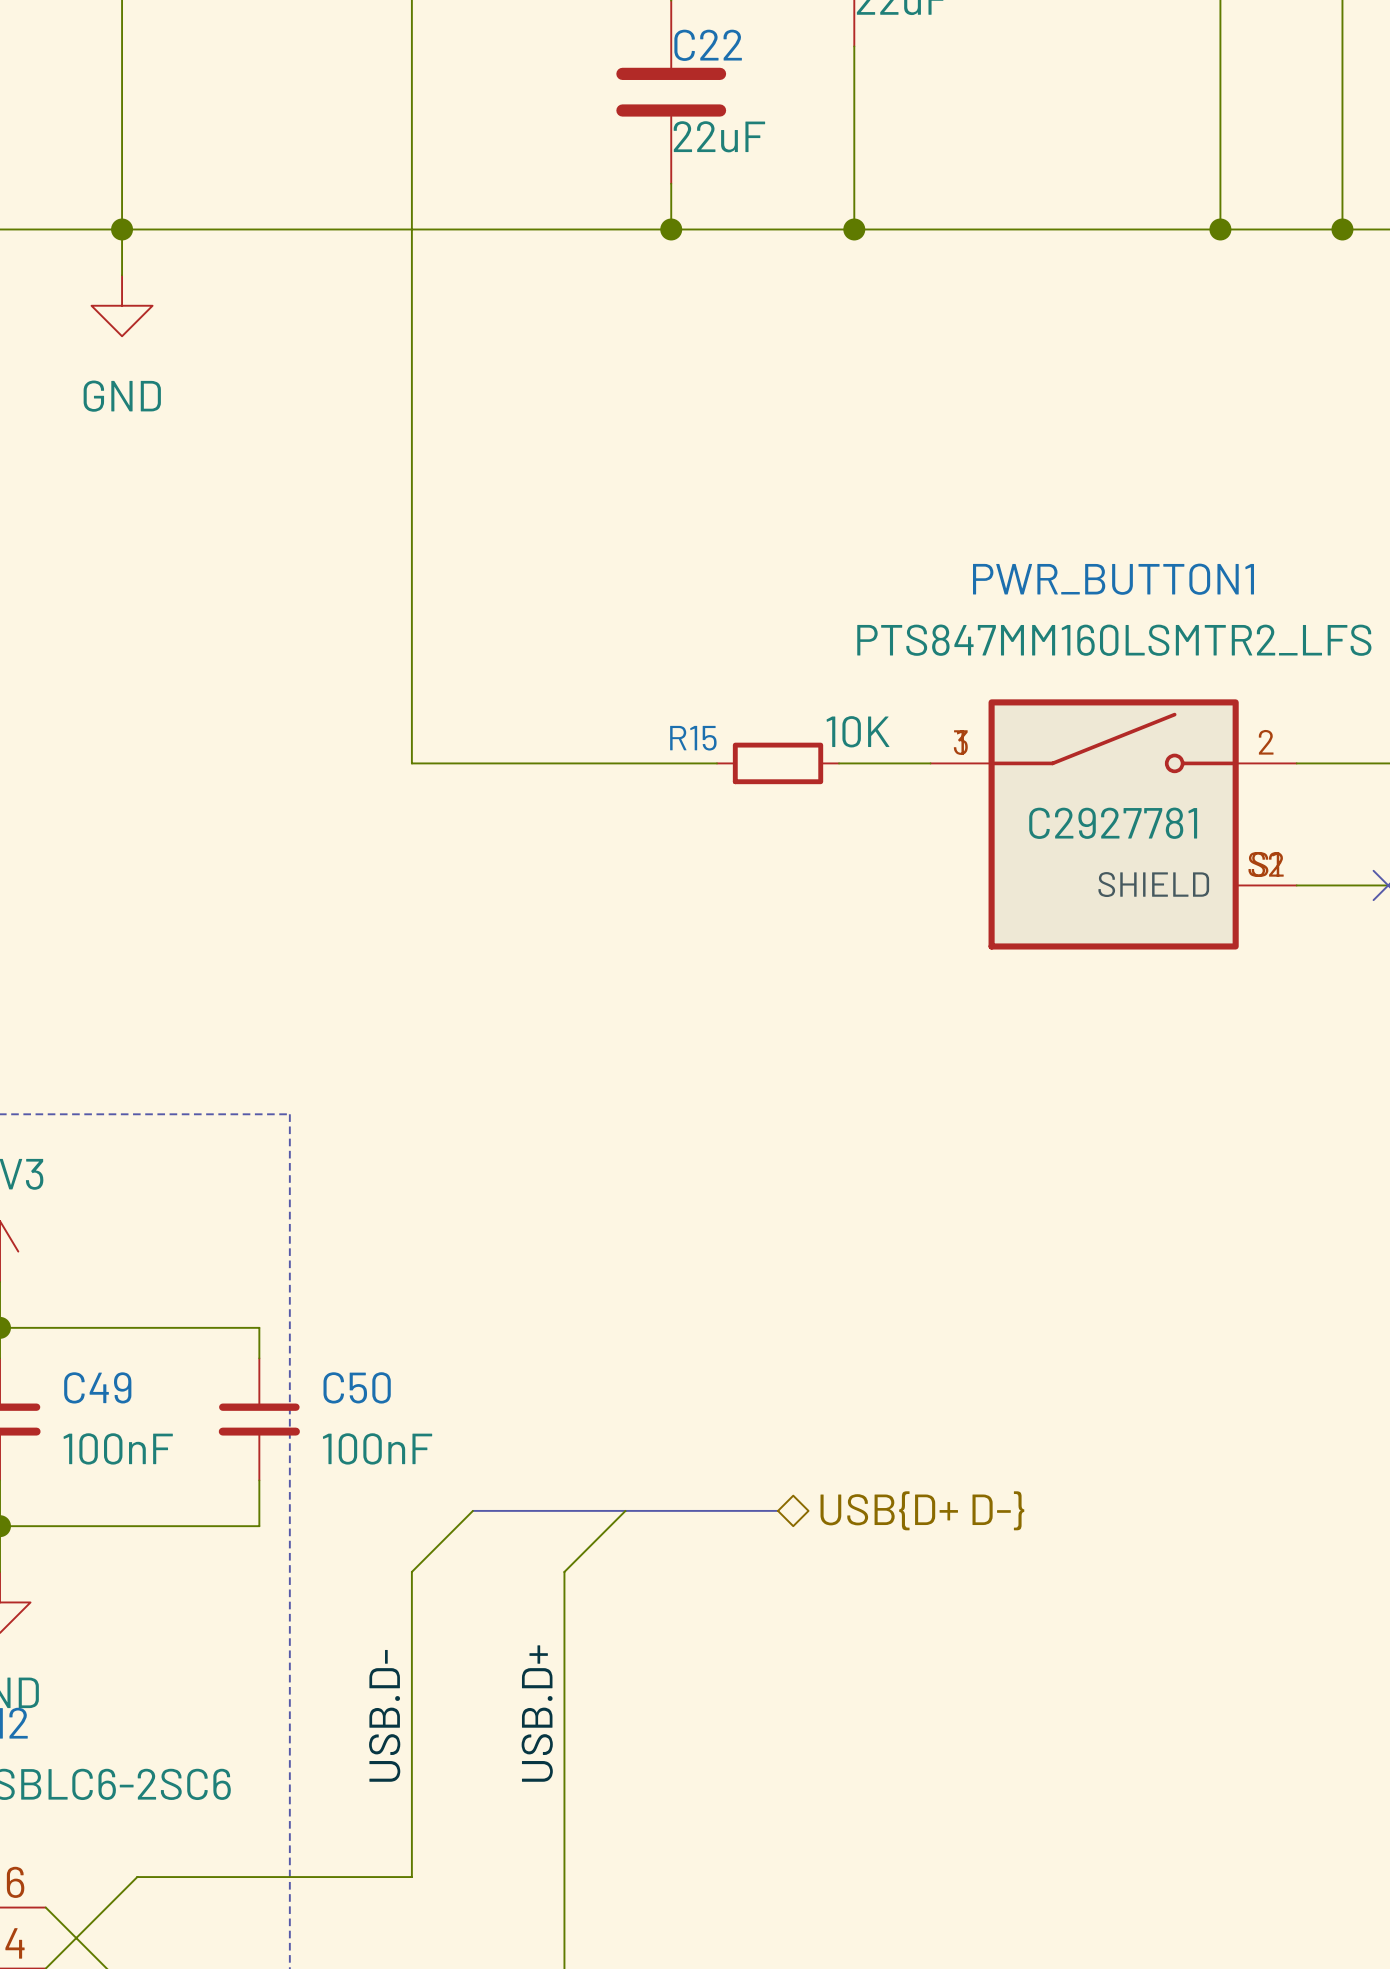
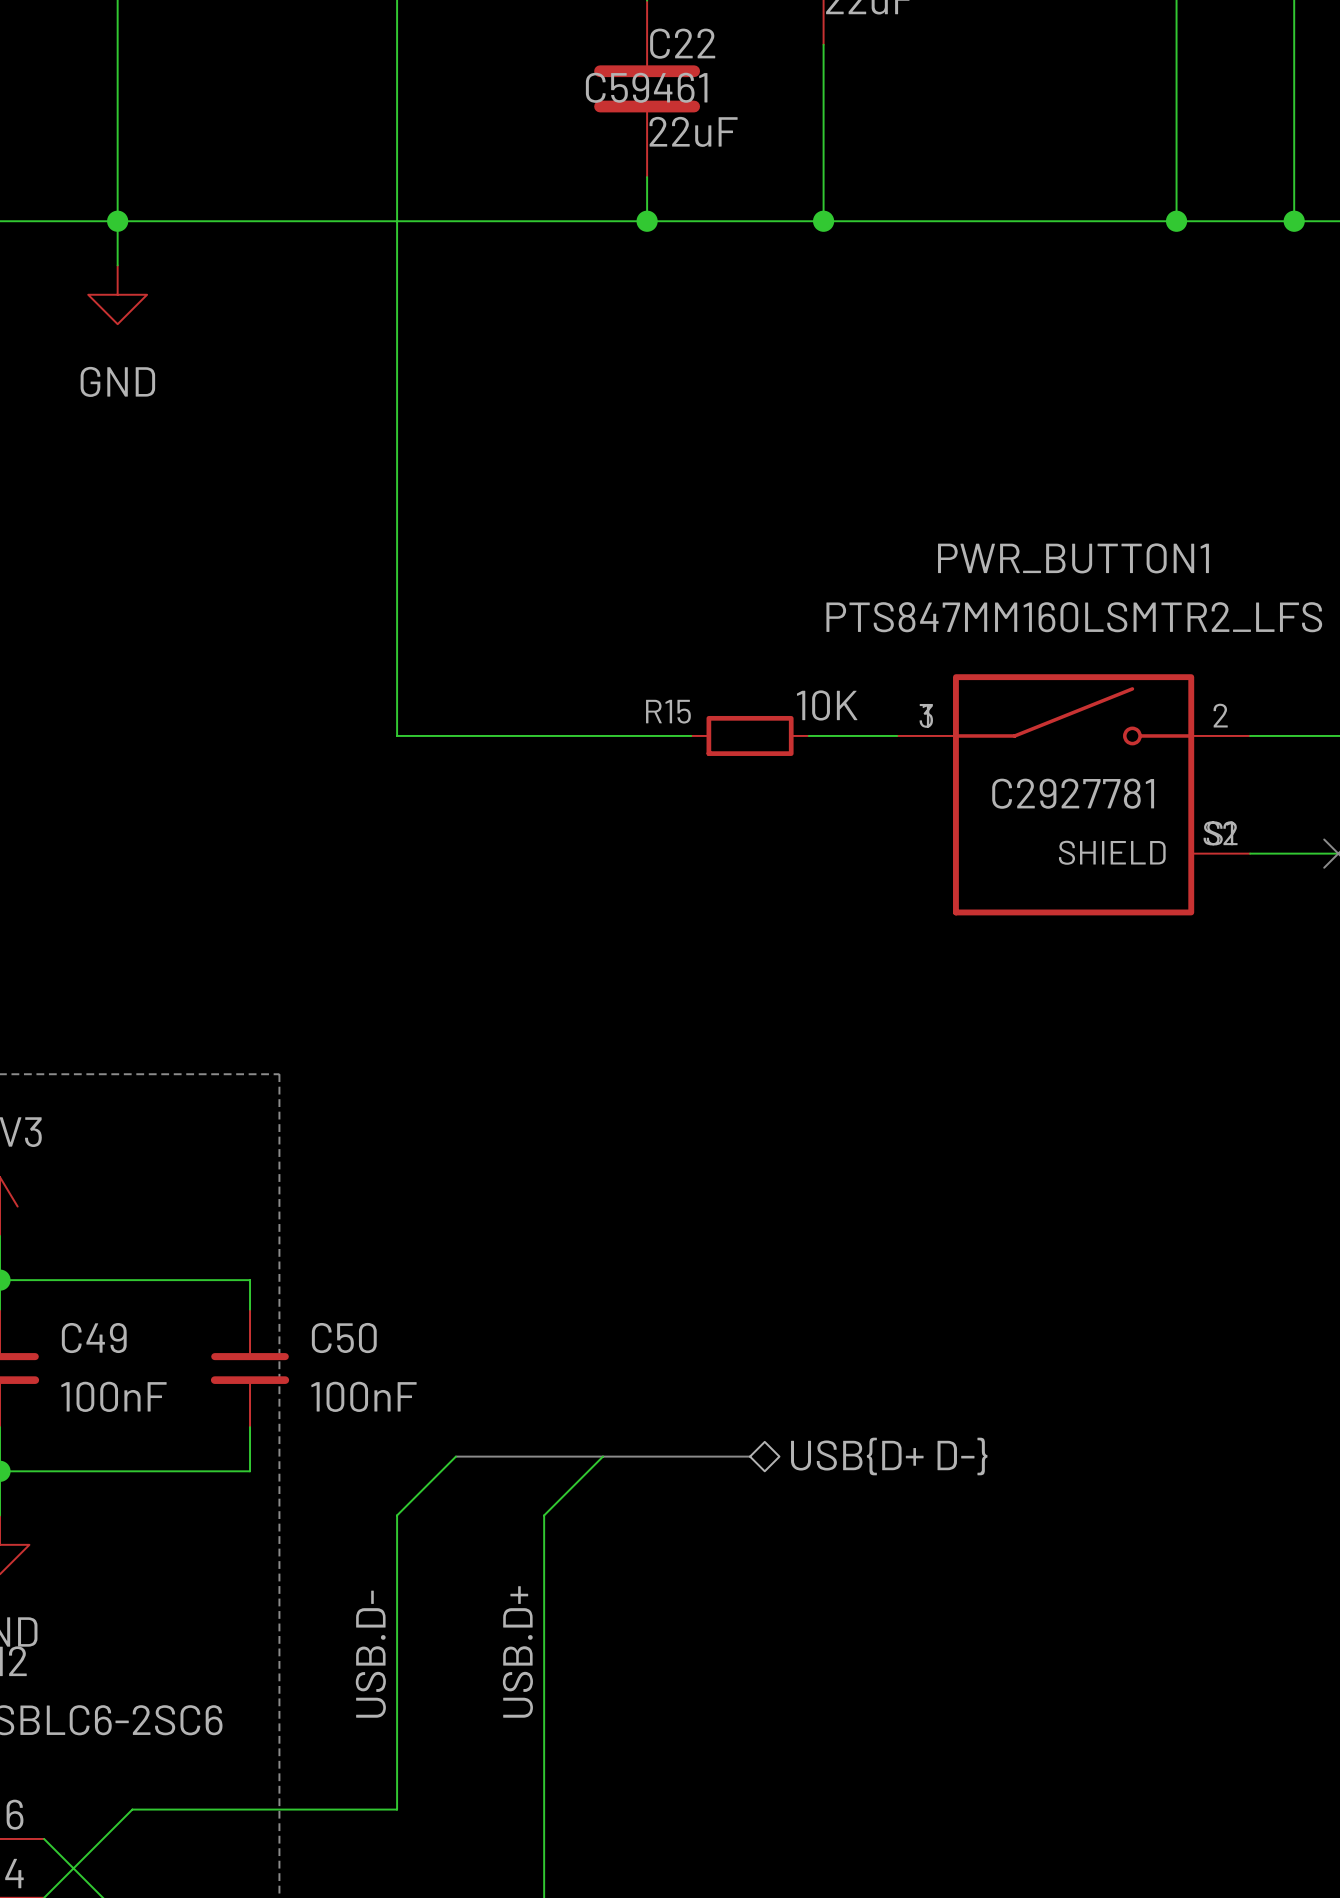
C22 text: none -> C59461 (646, 87)

